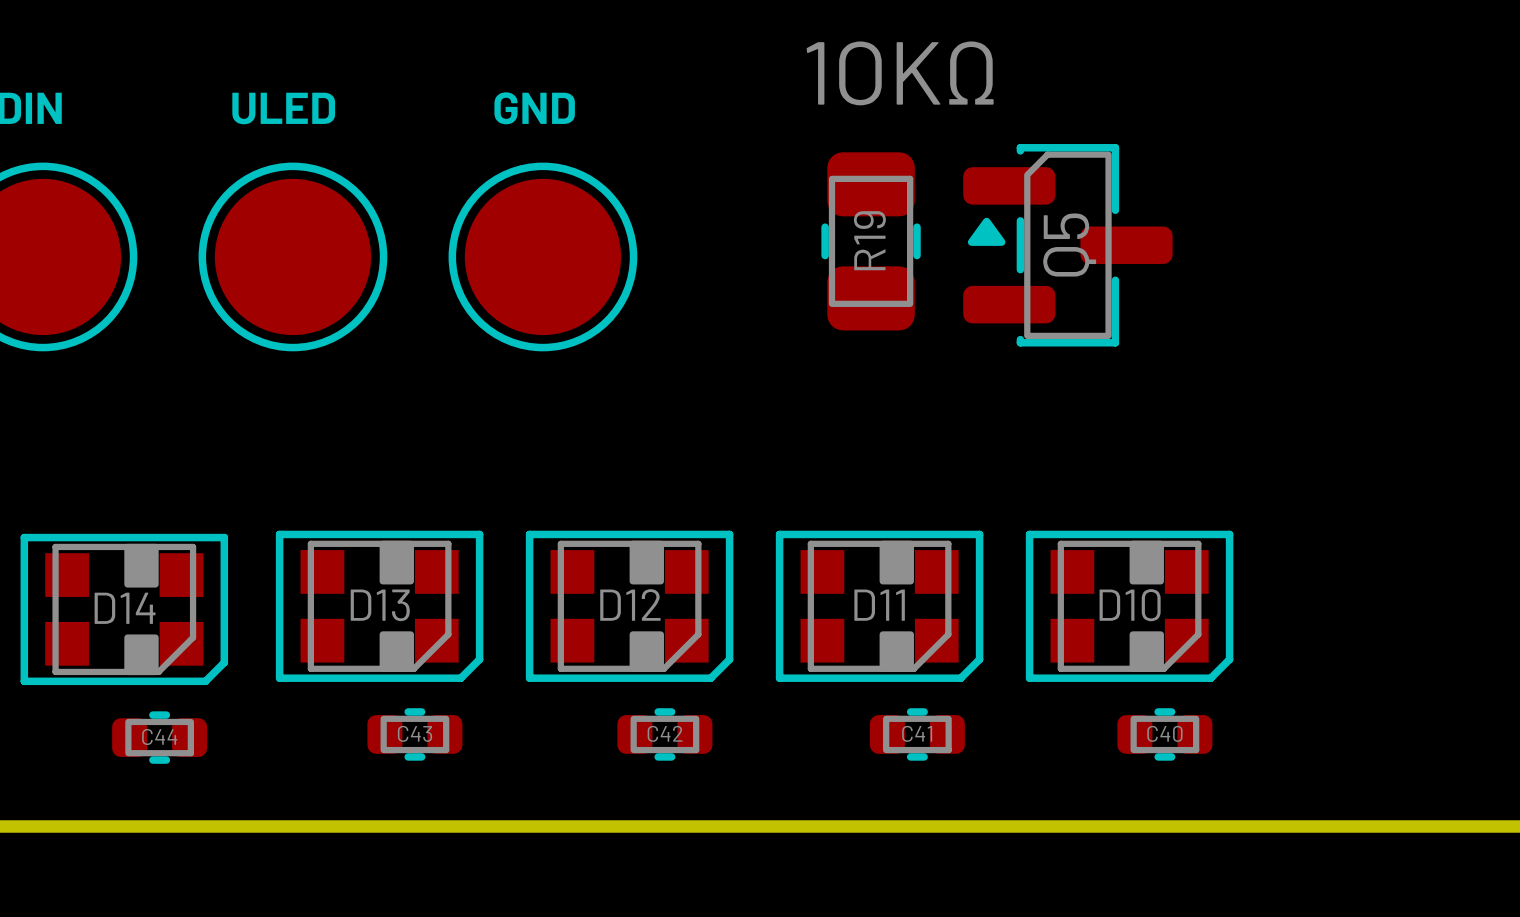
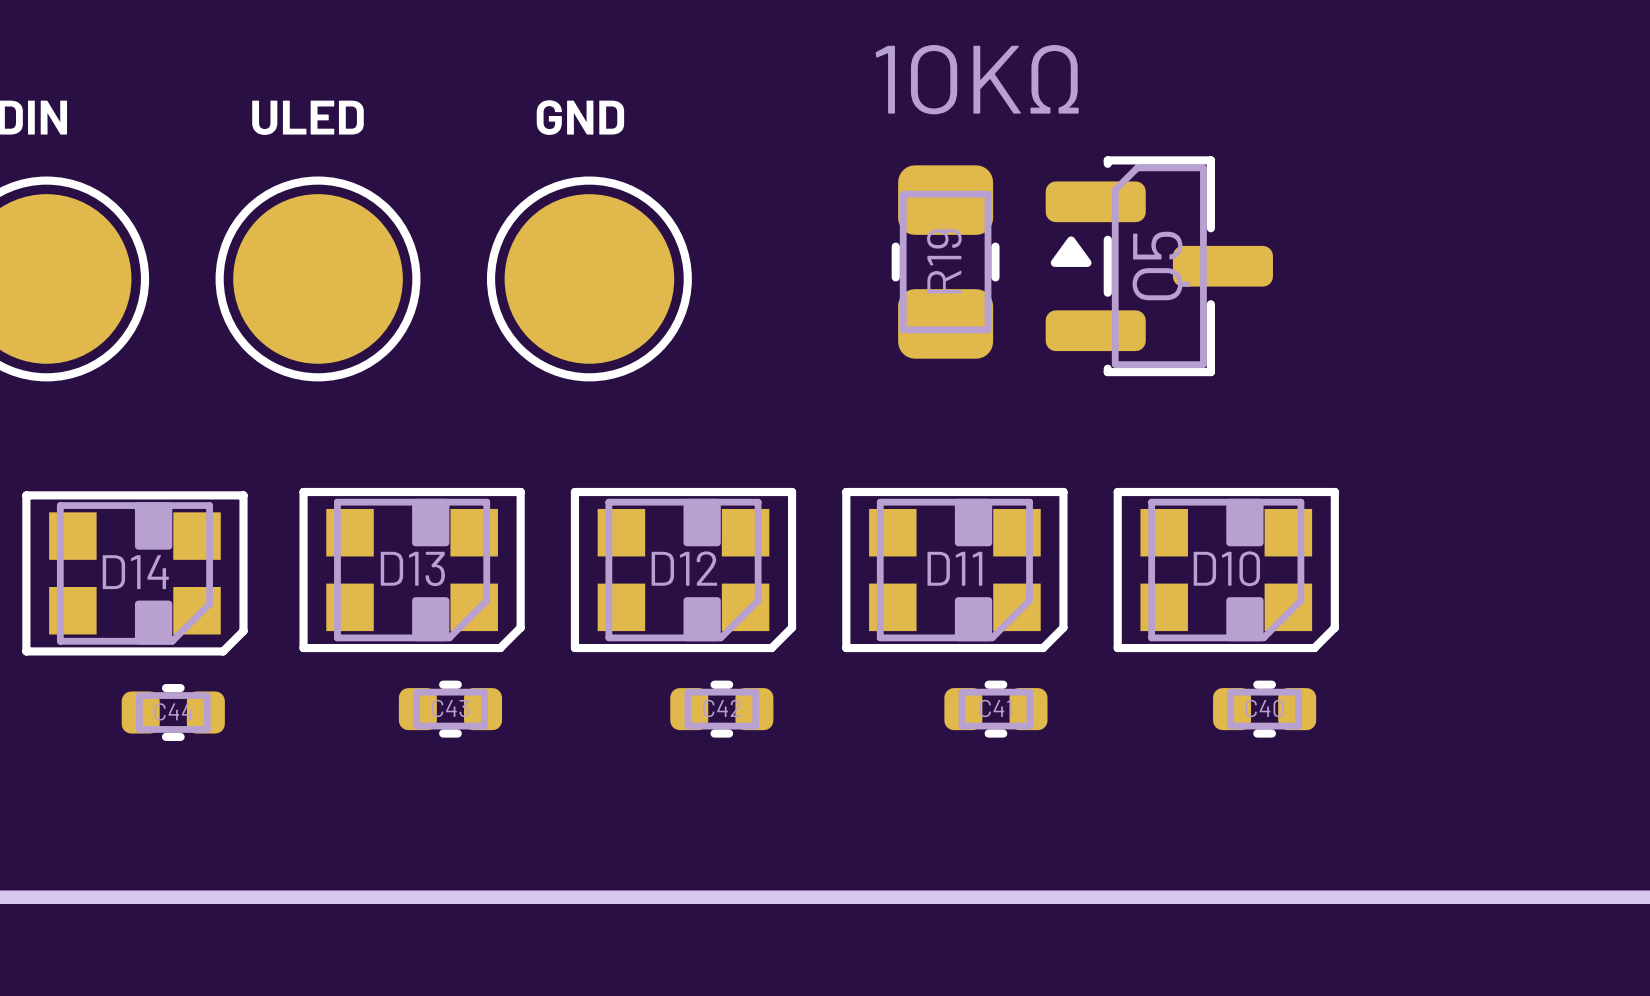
D13 position: (379, 606) -> (412, 570)
D12 position: (629, 606) -> (683, 570)
D11 position: (879, 606) -> (954, 570)
D10 position: (1129, 606) -> (1226, 570)
D14 position: (124, 609) -> (134, 573)
C43 position: (414, 734) -> (450, 709)
C42 position: (664, 734) -> (721, 709)
C41 position: (917, 734) -> (995, 709)
C40 position: (1164, 734) -> (1264, 709)
C44 position: (159, 737) -> (173, 712)

